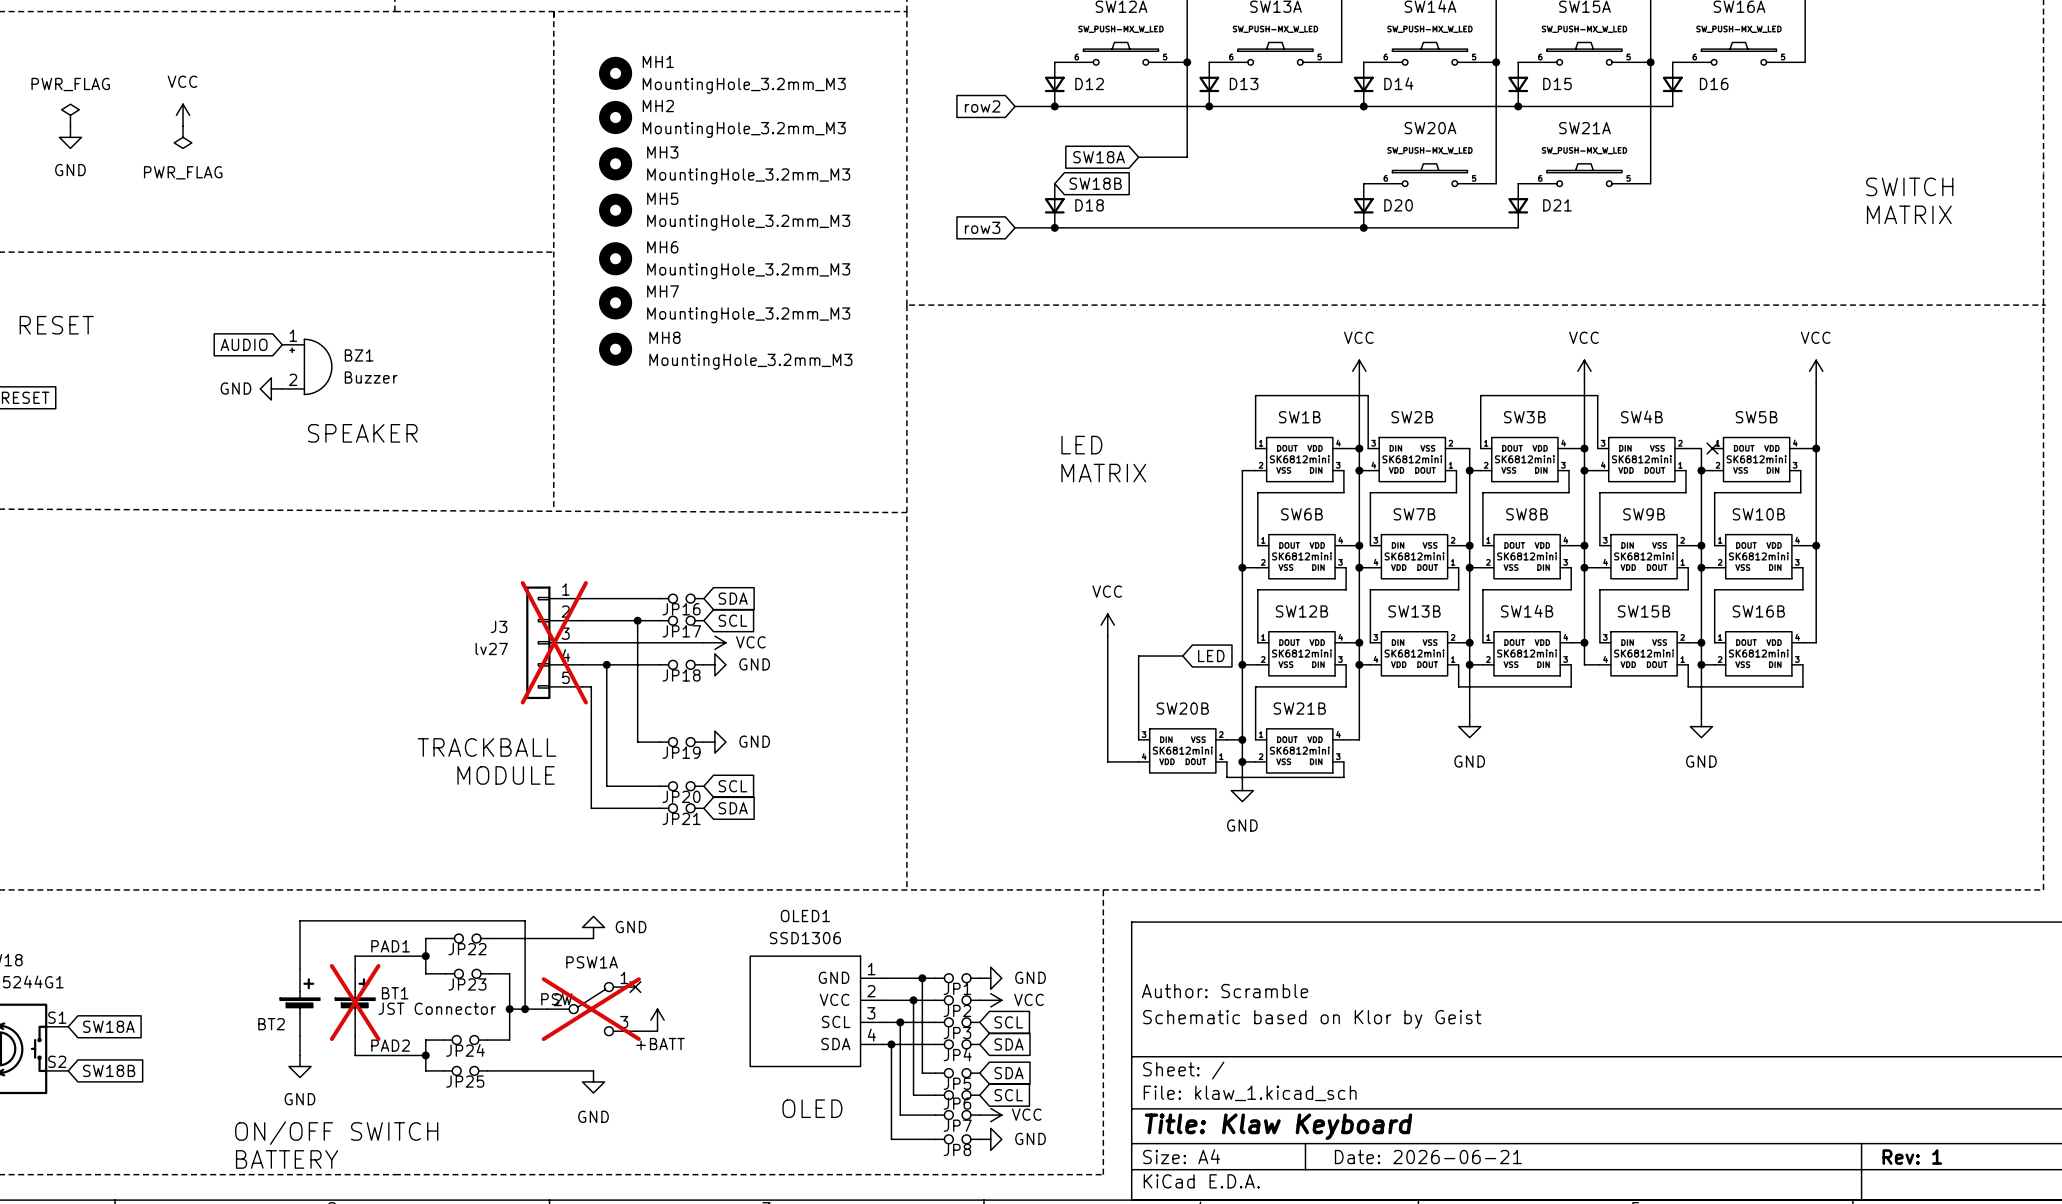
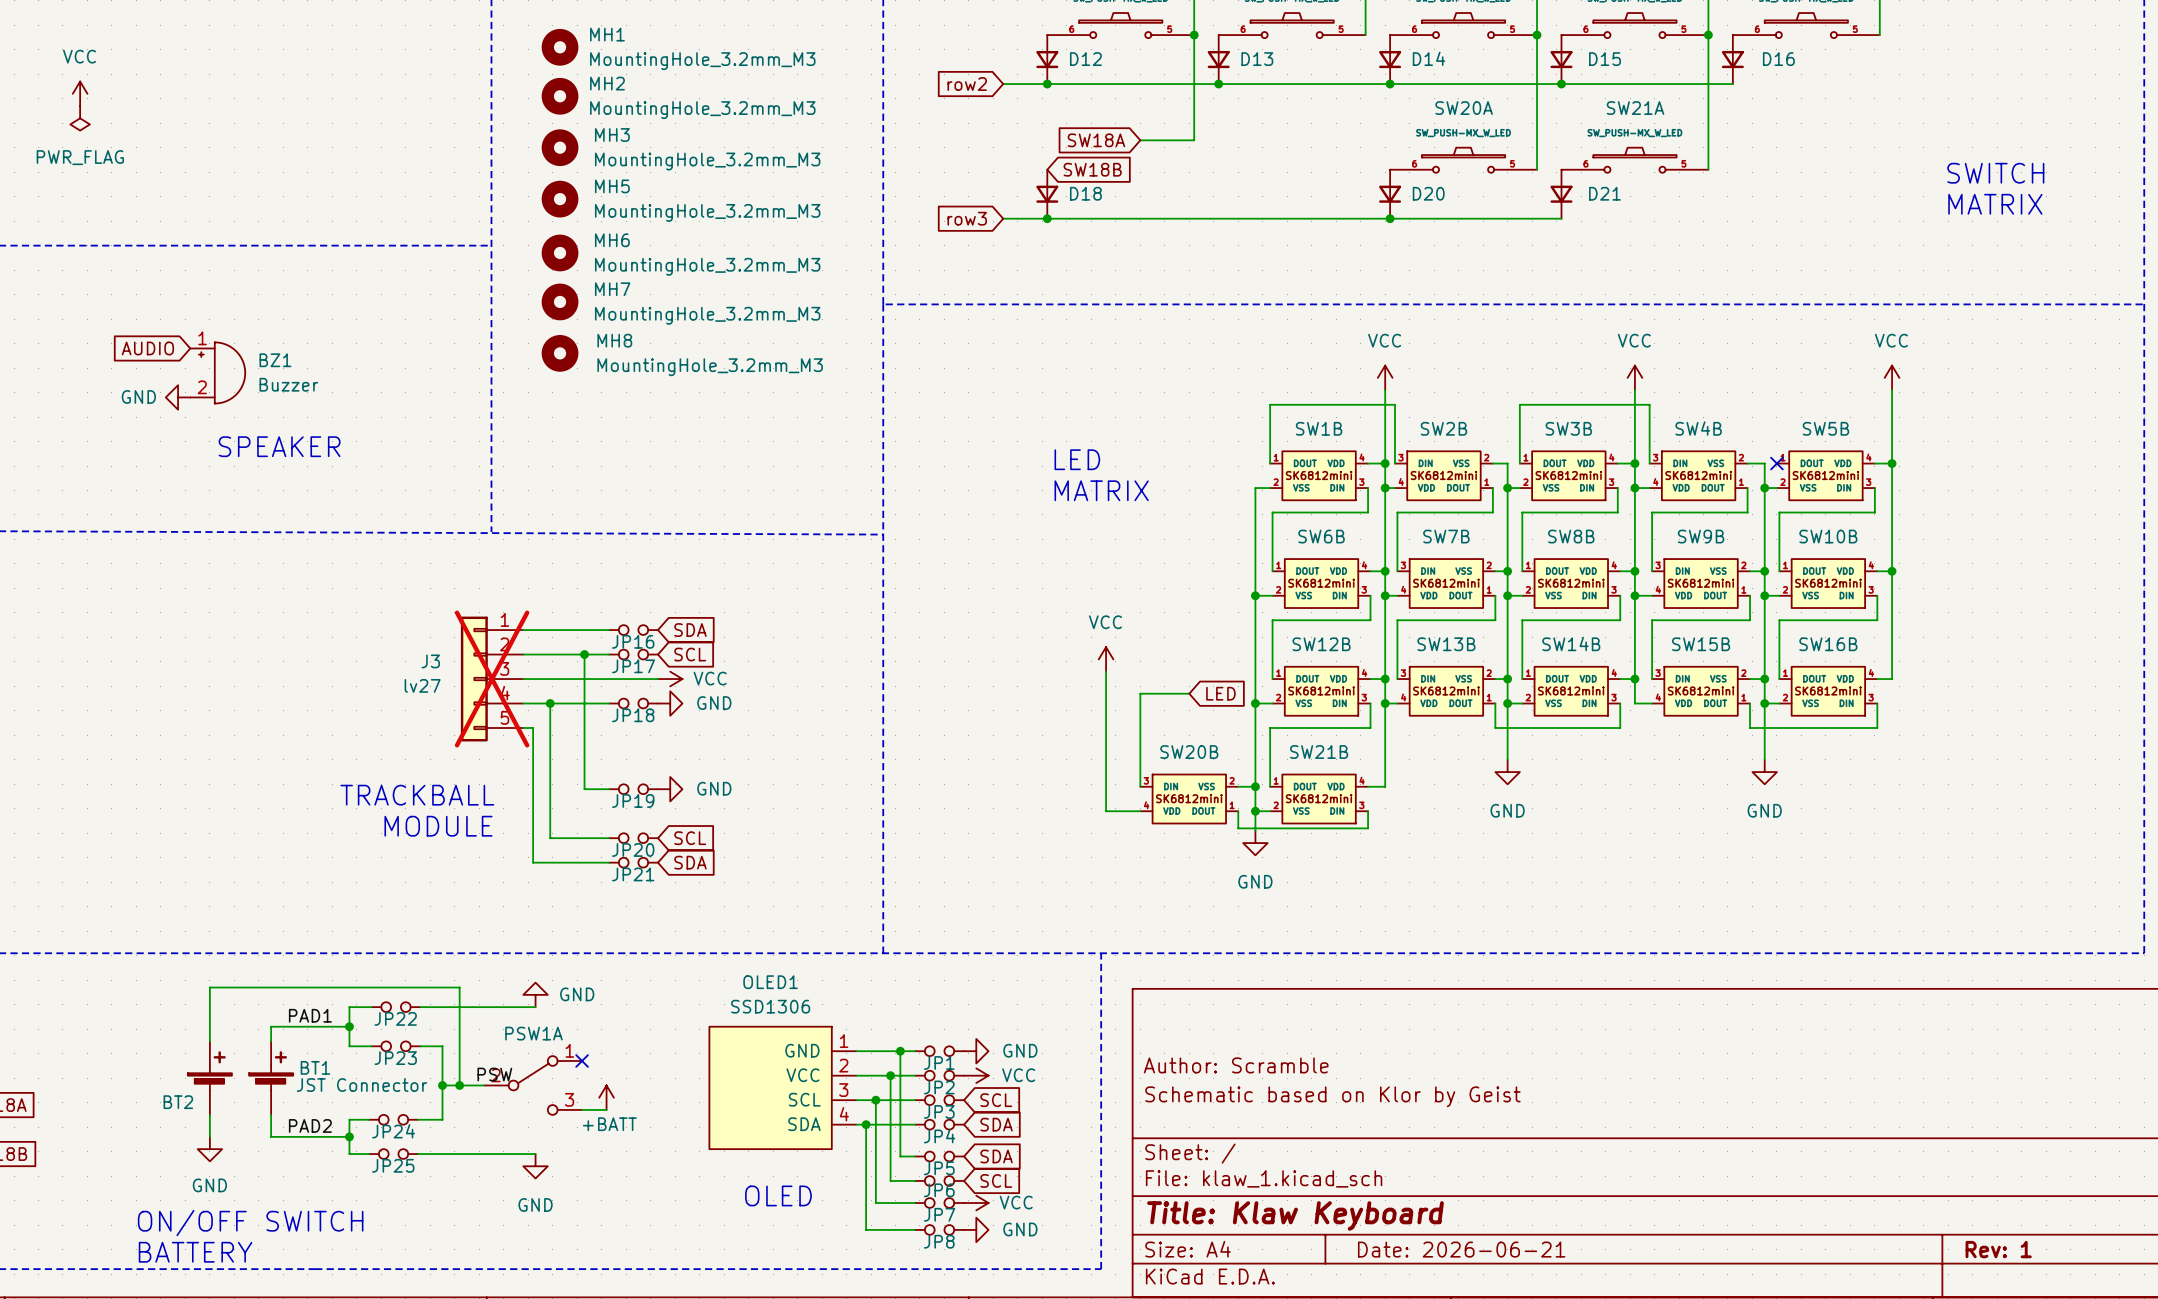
BT1 do-not-place cross: (355, 1002) -> none
PSW1A do-not-place cross: (591, 1009) -> none

